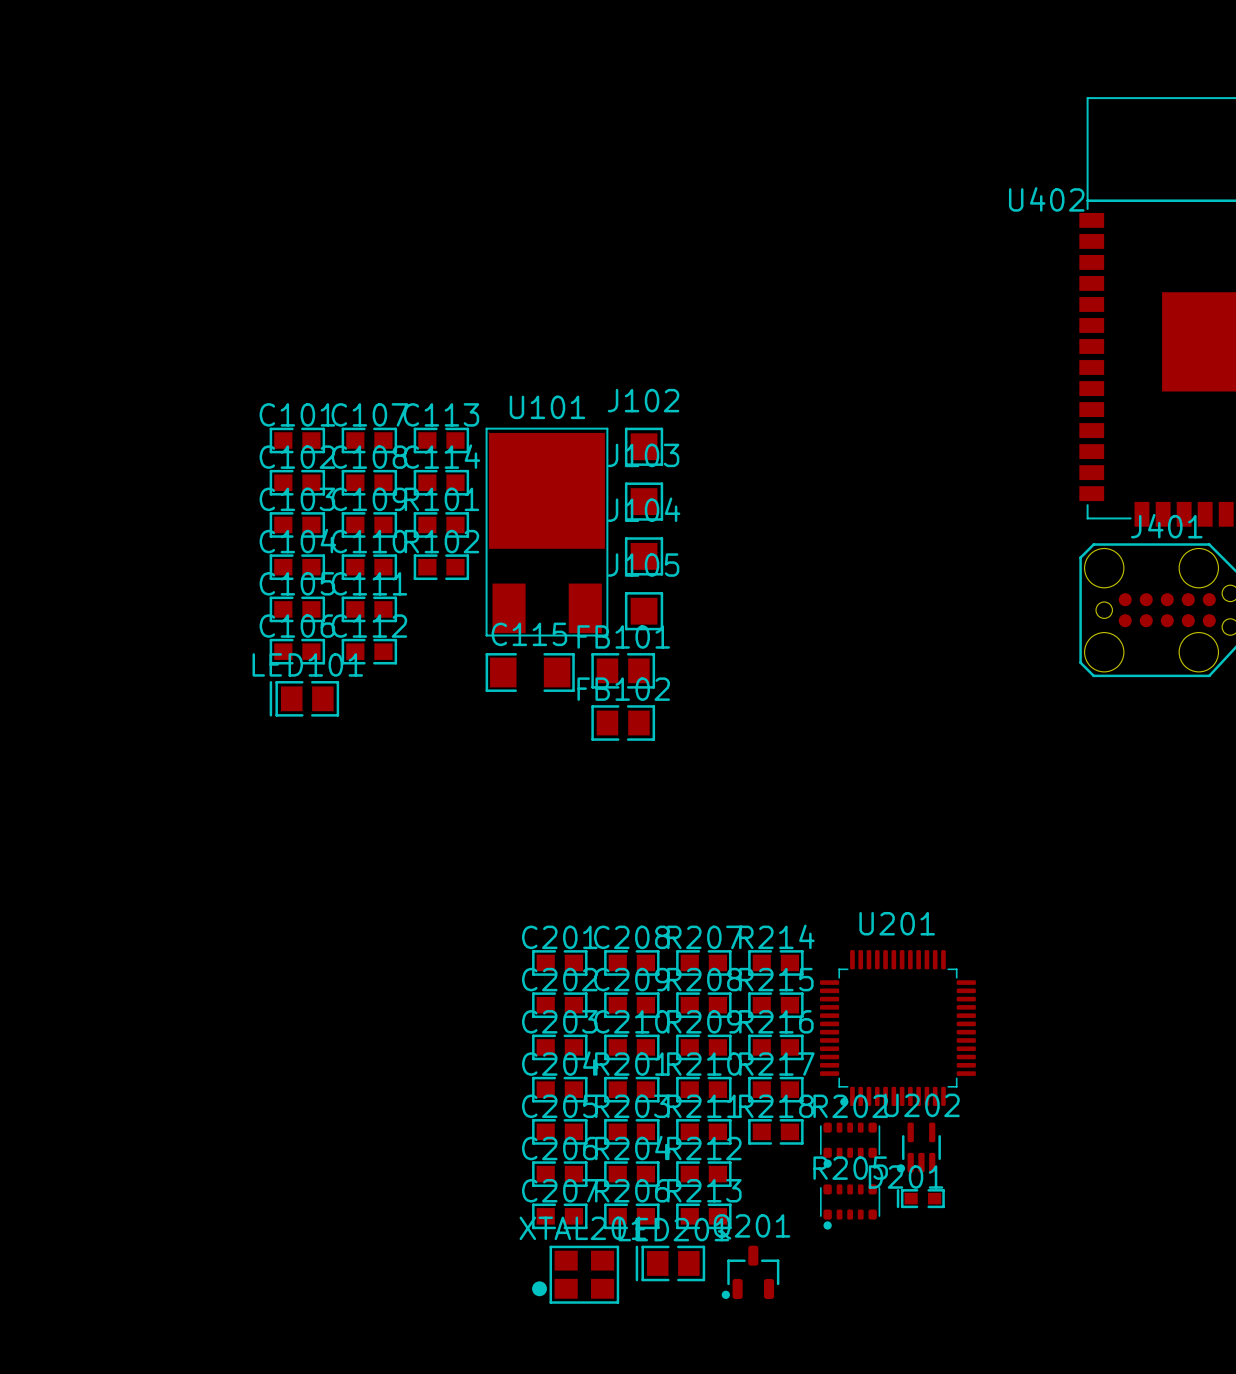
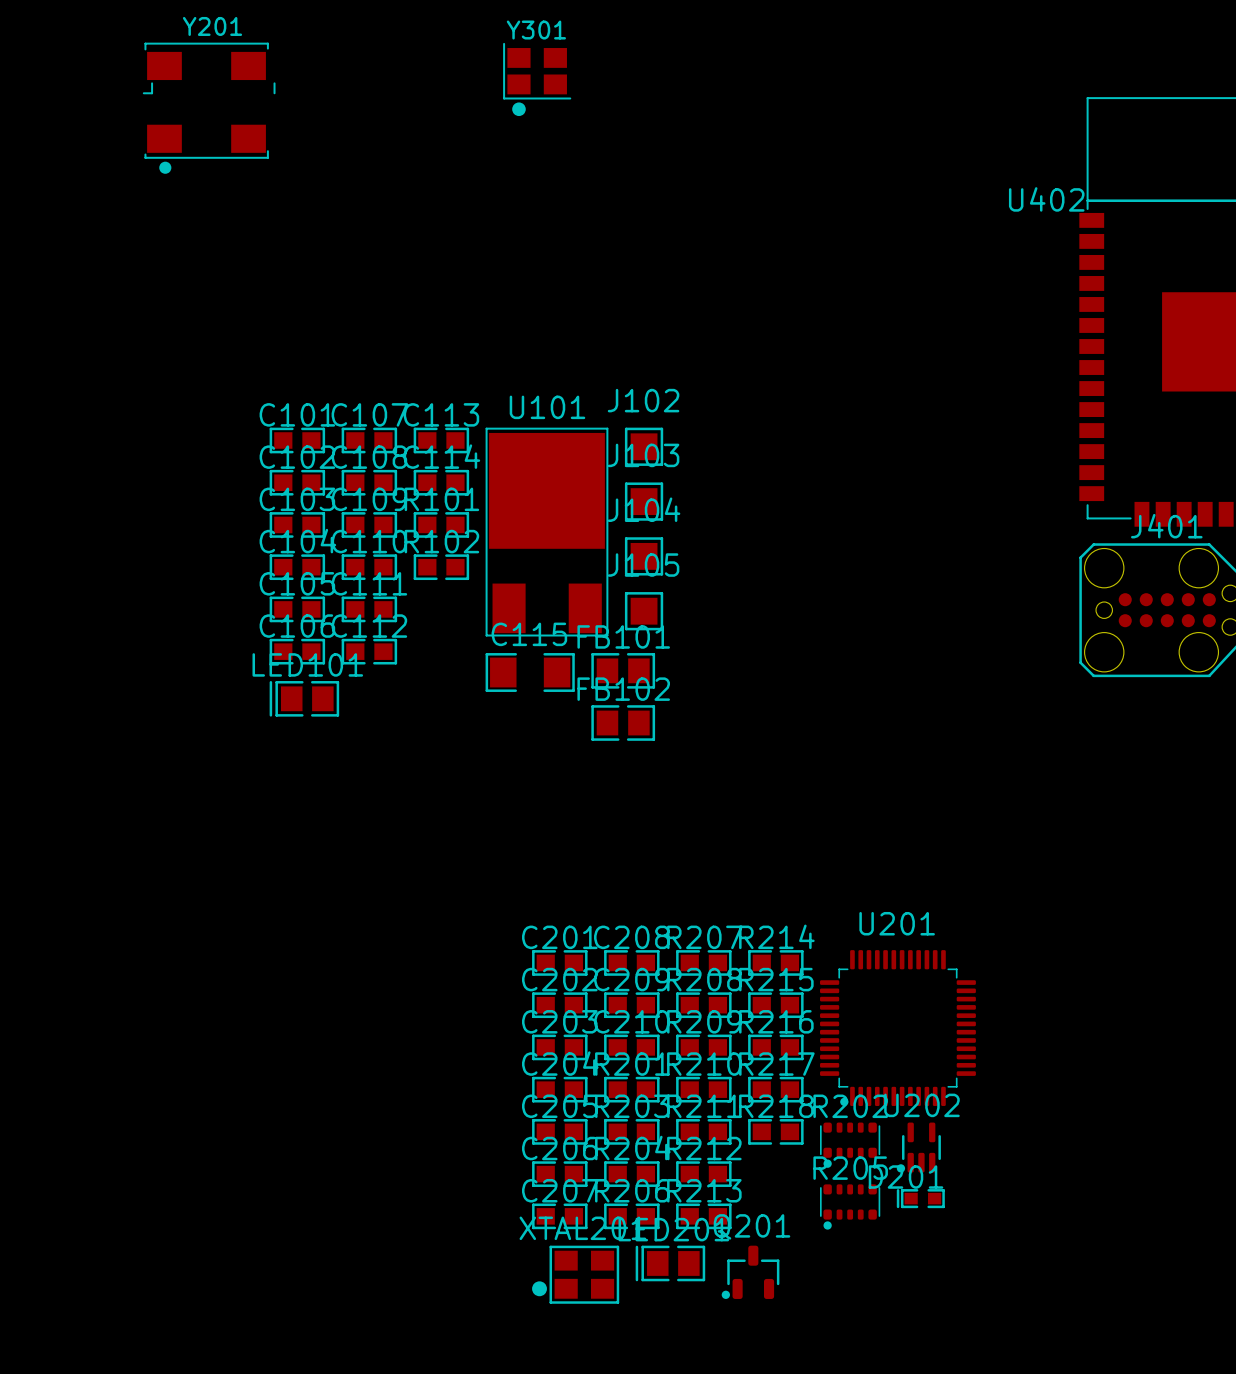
Y301: none -> (537, 79)
Y201: none -> (209, 108)

